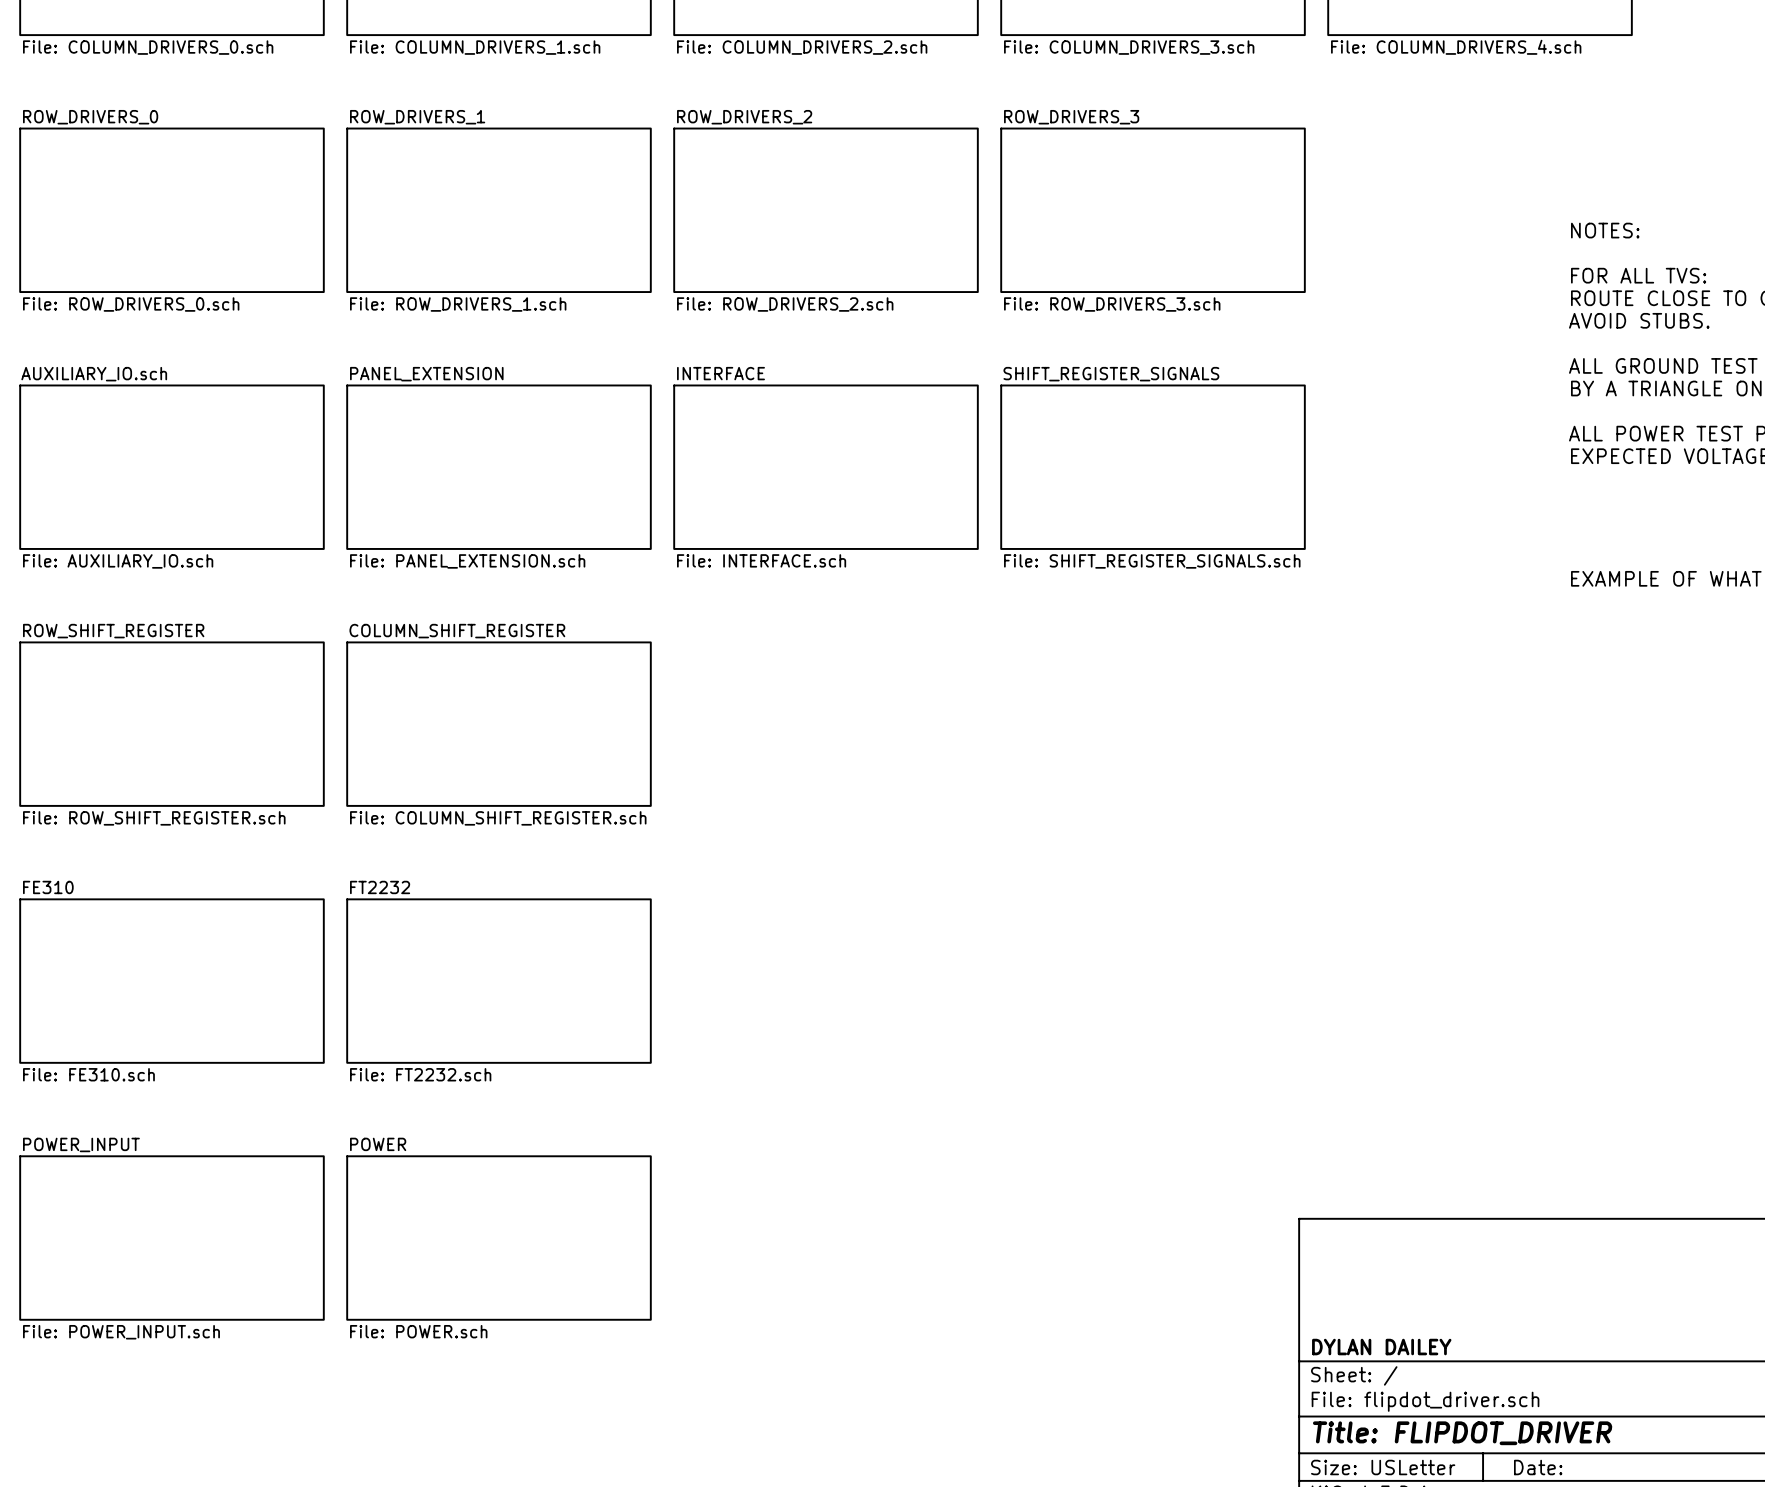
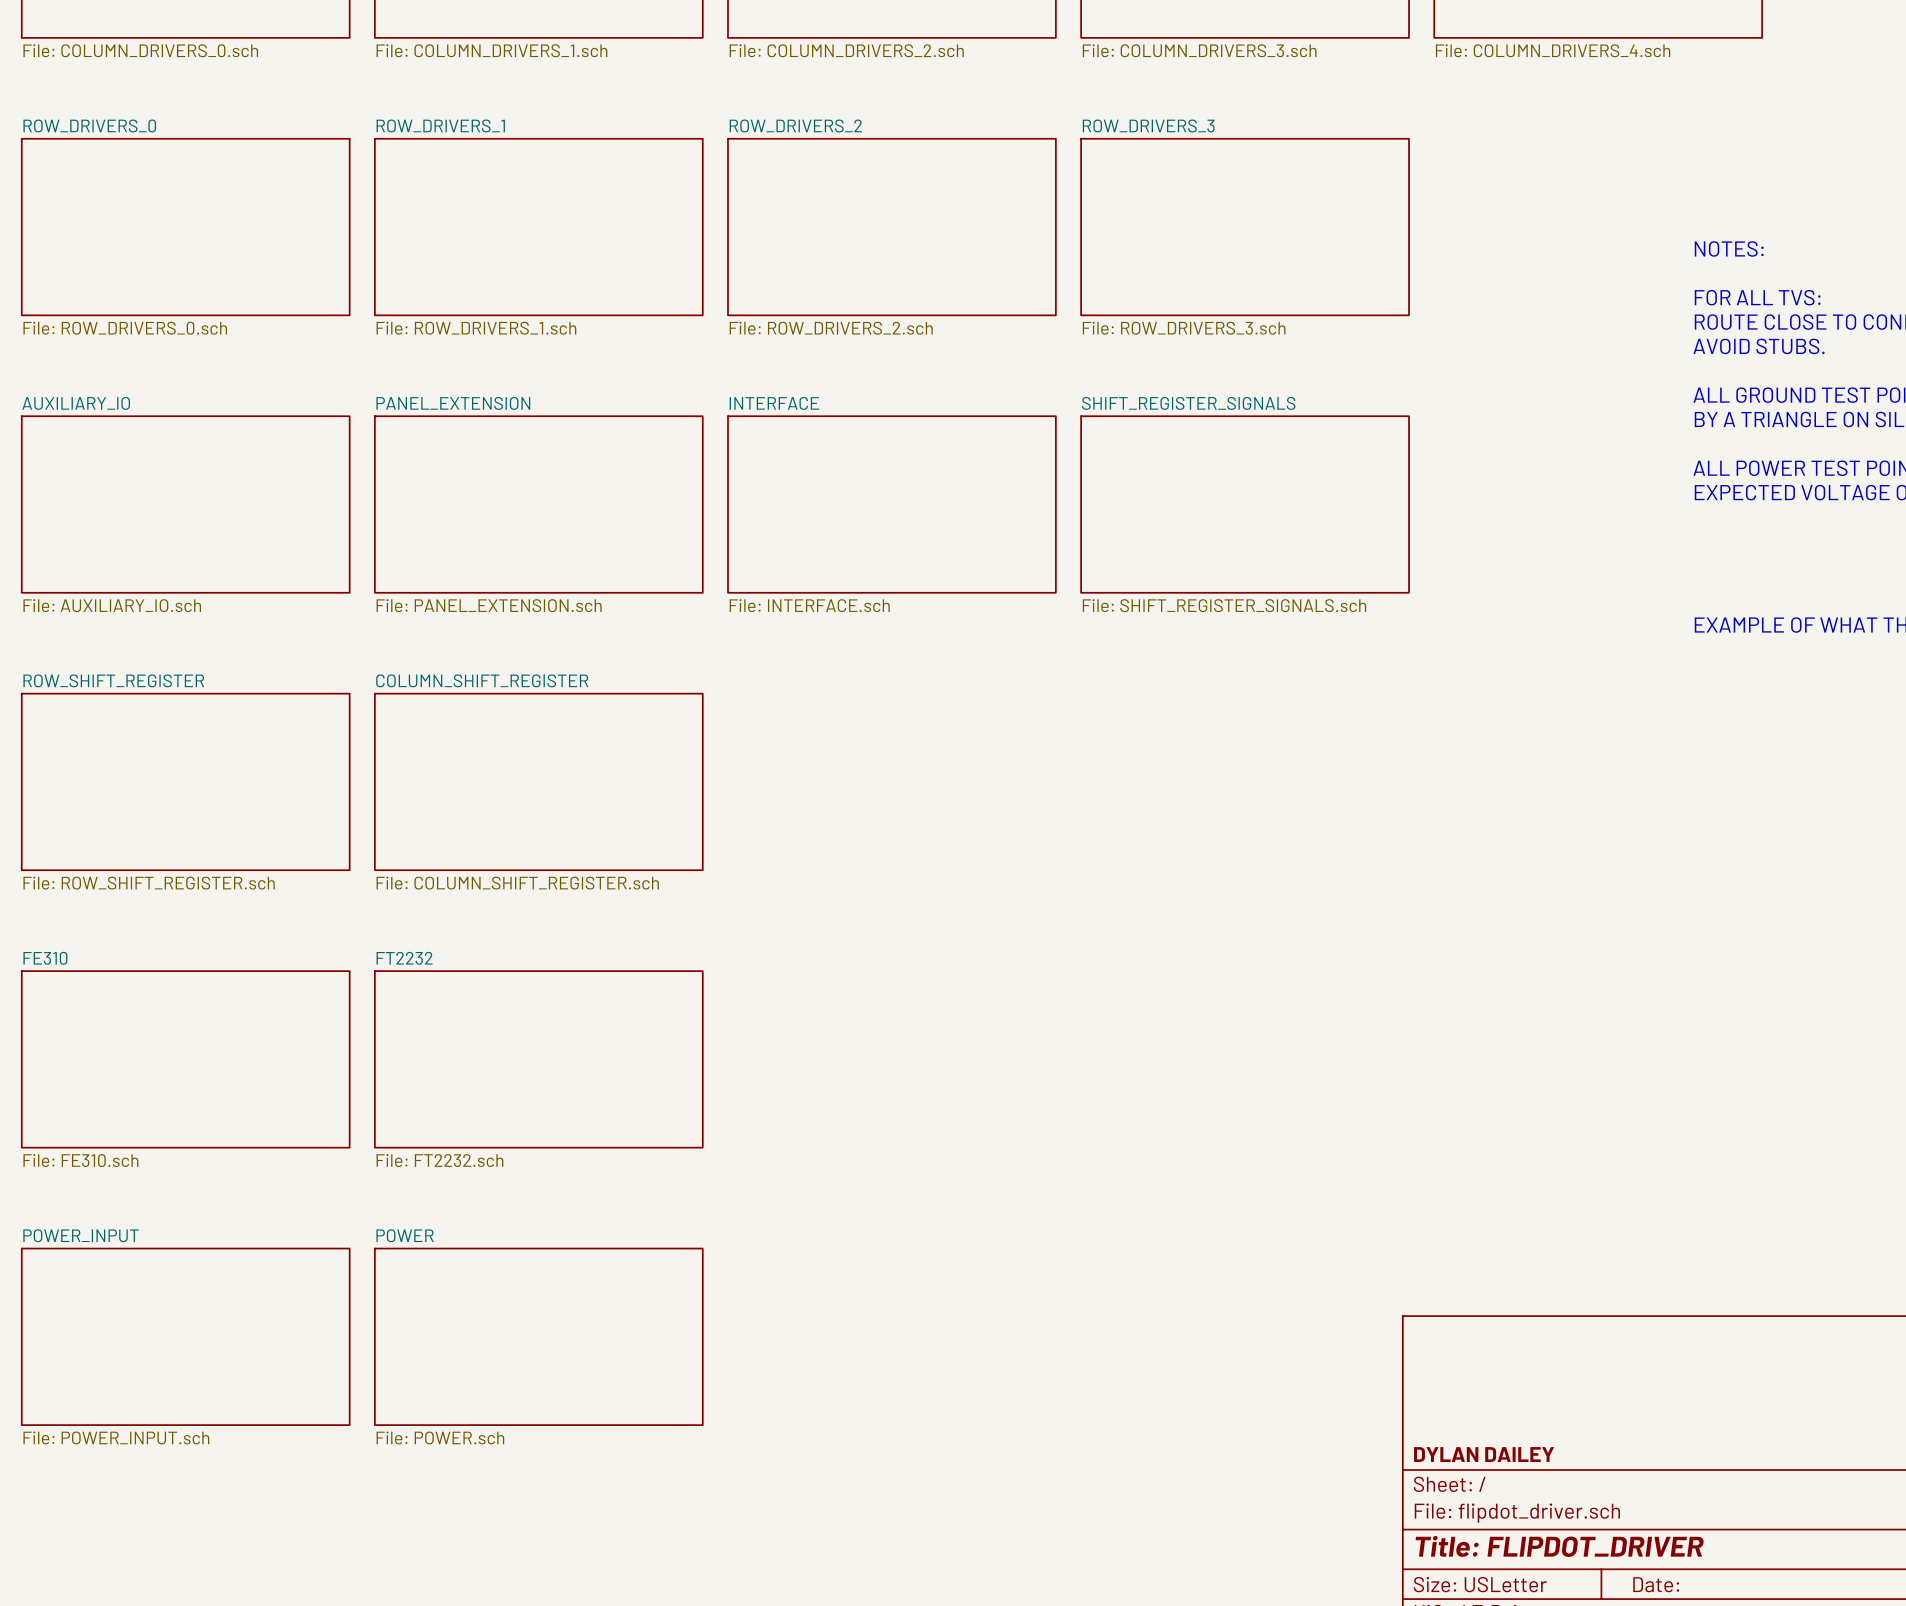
sheet AUXILIARY_IO.sch name: AUXILIARY_IO.sch (94, 374) -> AUXILIARY_IO (76, 403)

